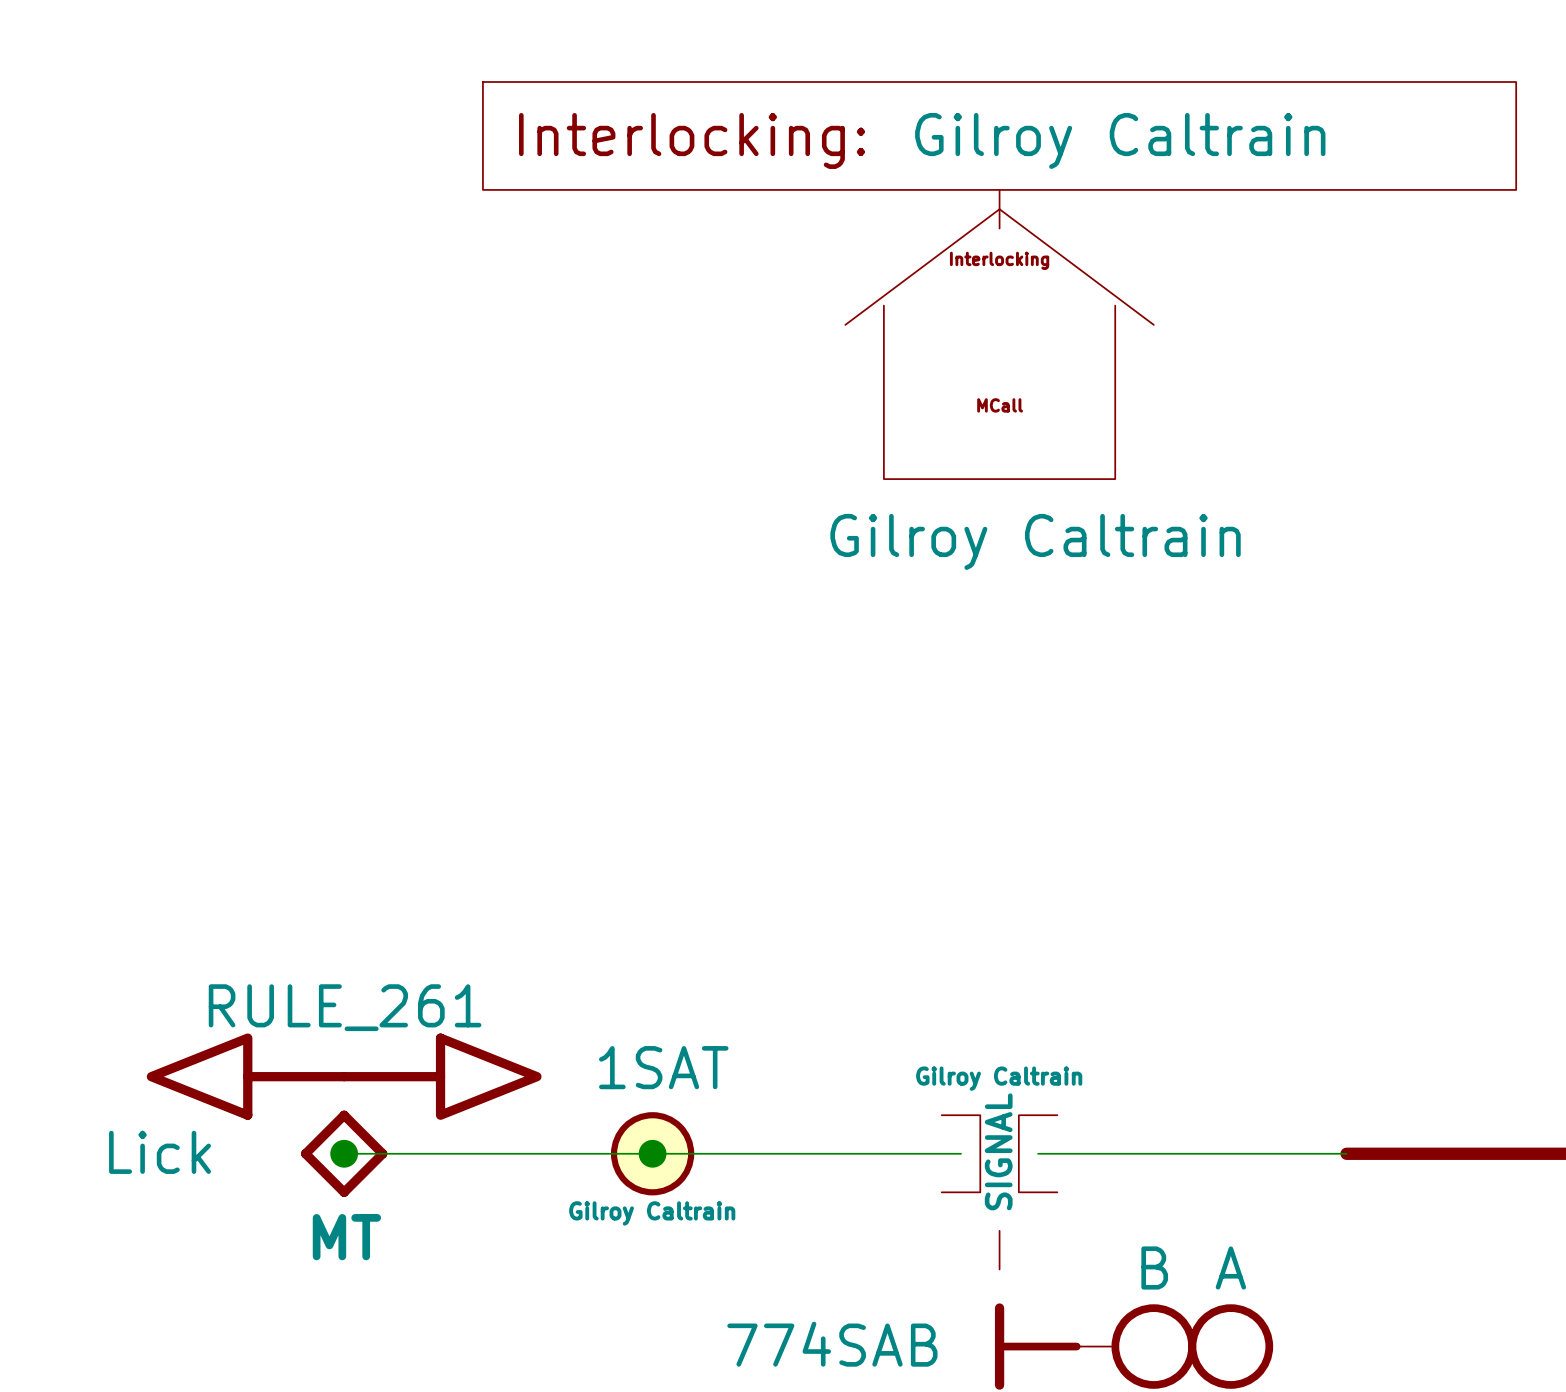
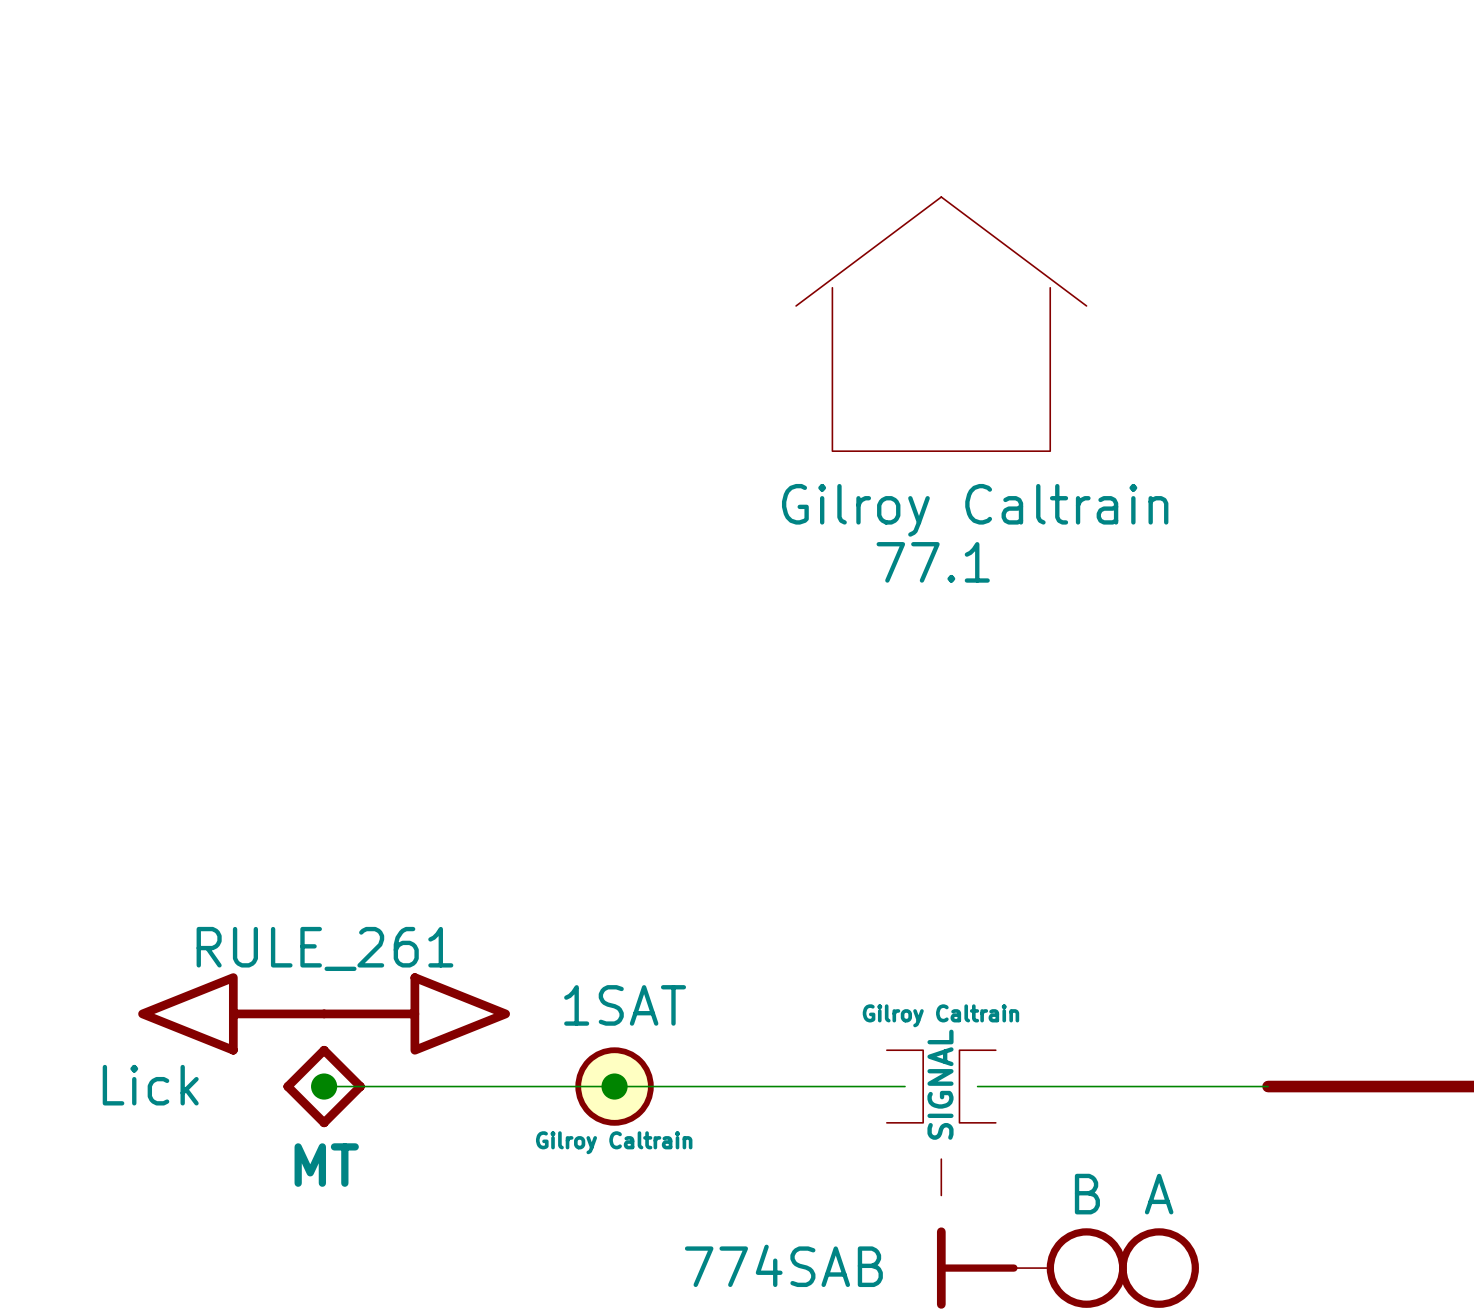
part: Gilroy Caltrain (999, 155) -> none
part text: Interlocking (999, 260) -> none
part text: MCall (1000, 405) -> none
part text: none -> 77.1 (933, 562)

